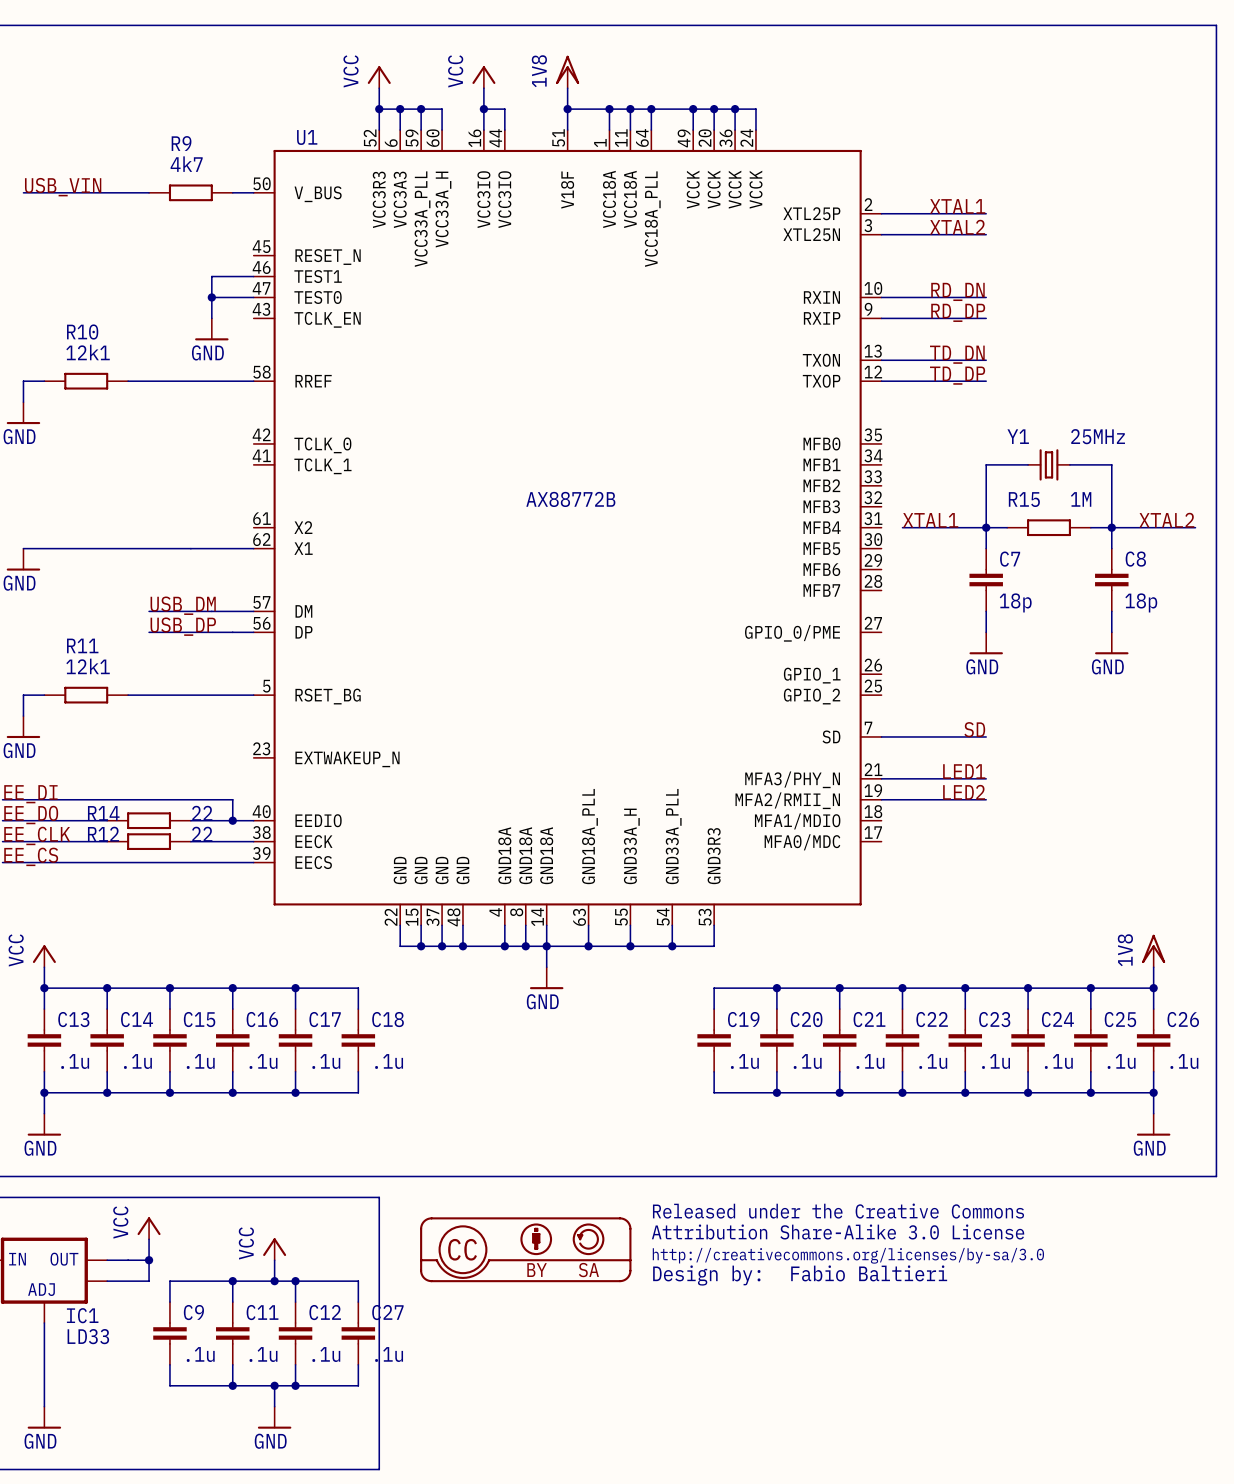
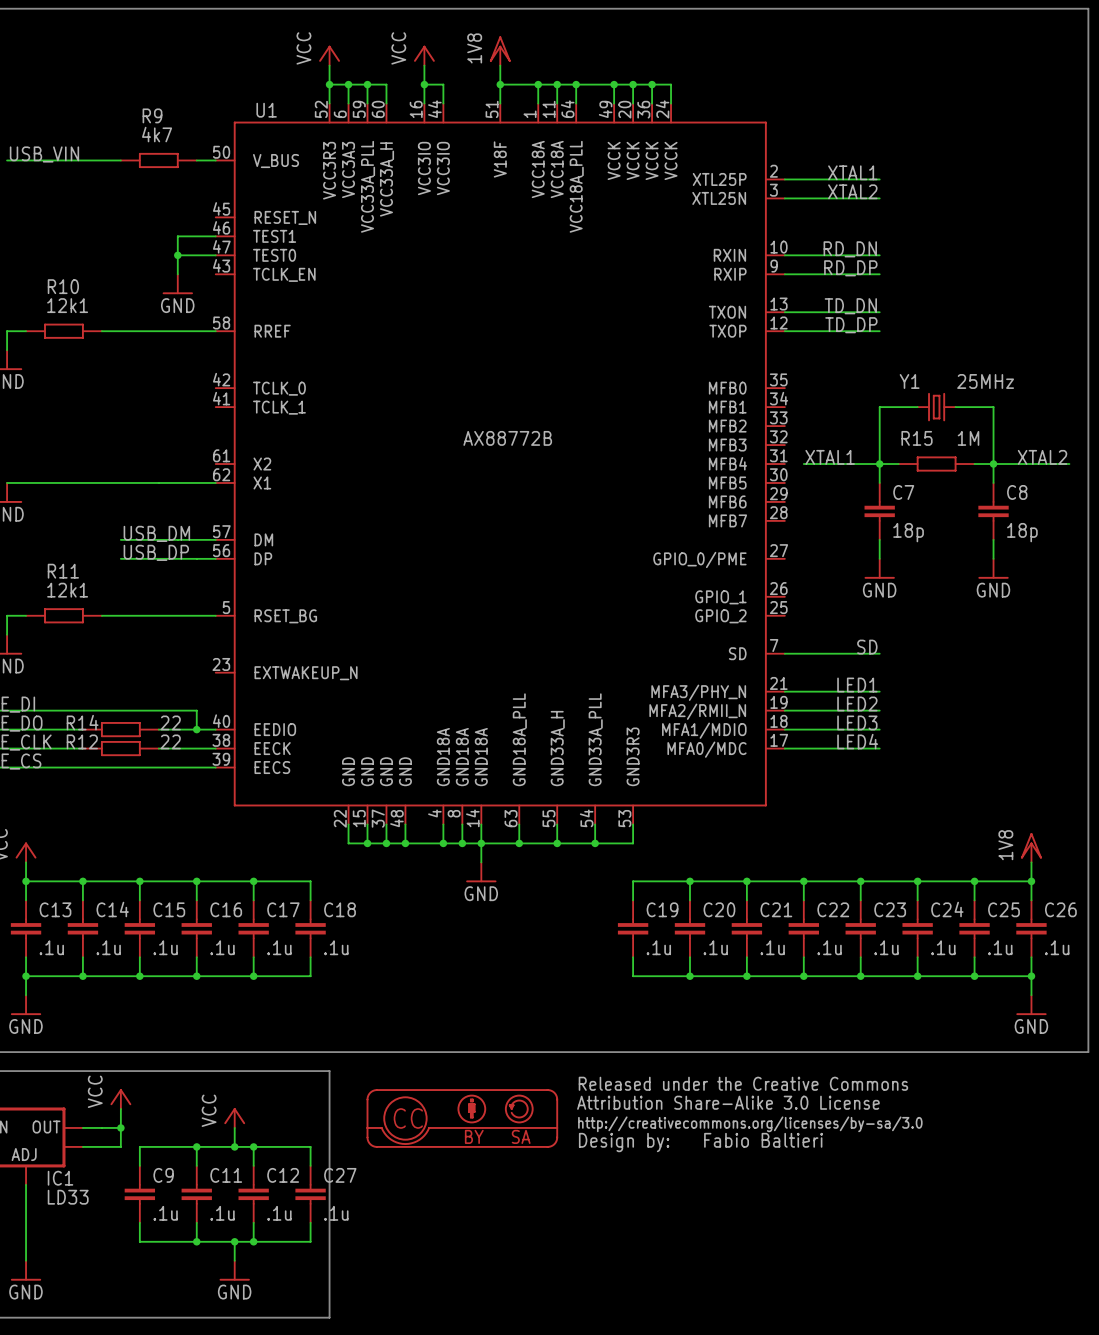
label: none -> LED3 (857, 722)
wire: none -> (784, 729) (879, 729)
label: none -> LED4 (857, 741)
wire: none -> (784, 748) (879, 748)

